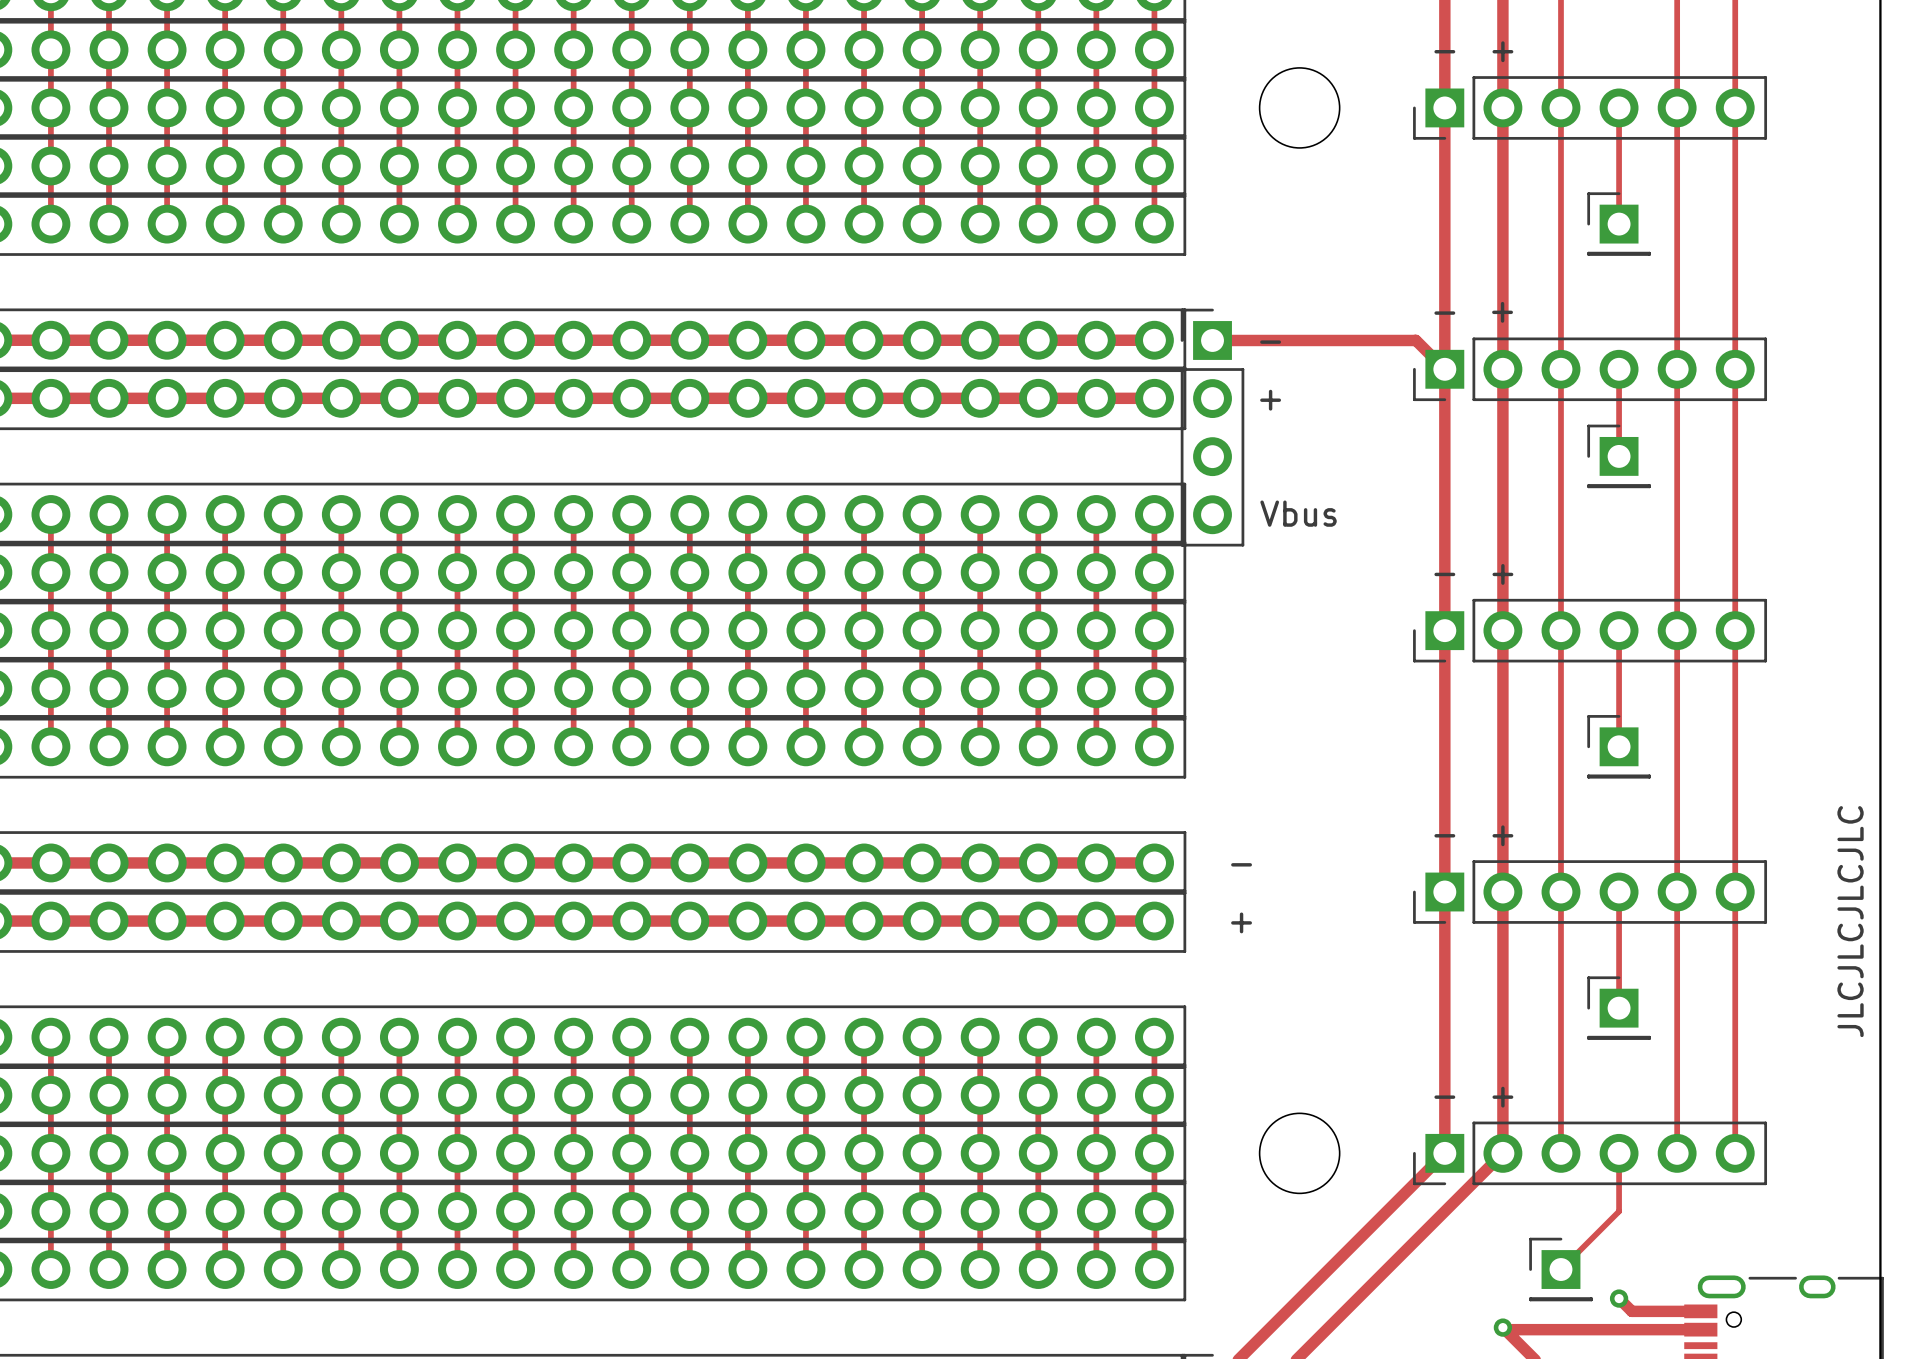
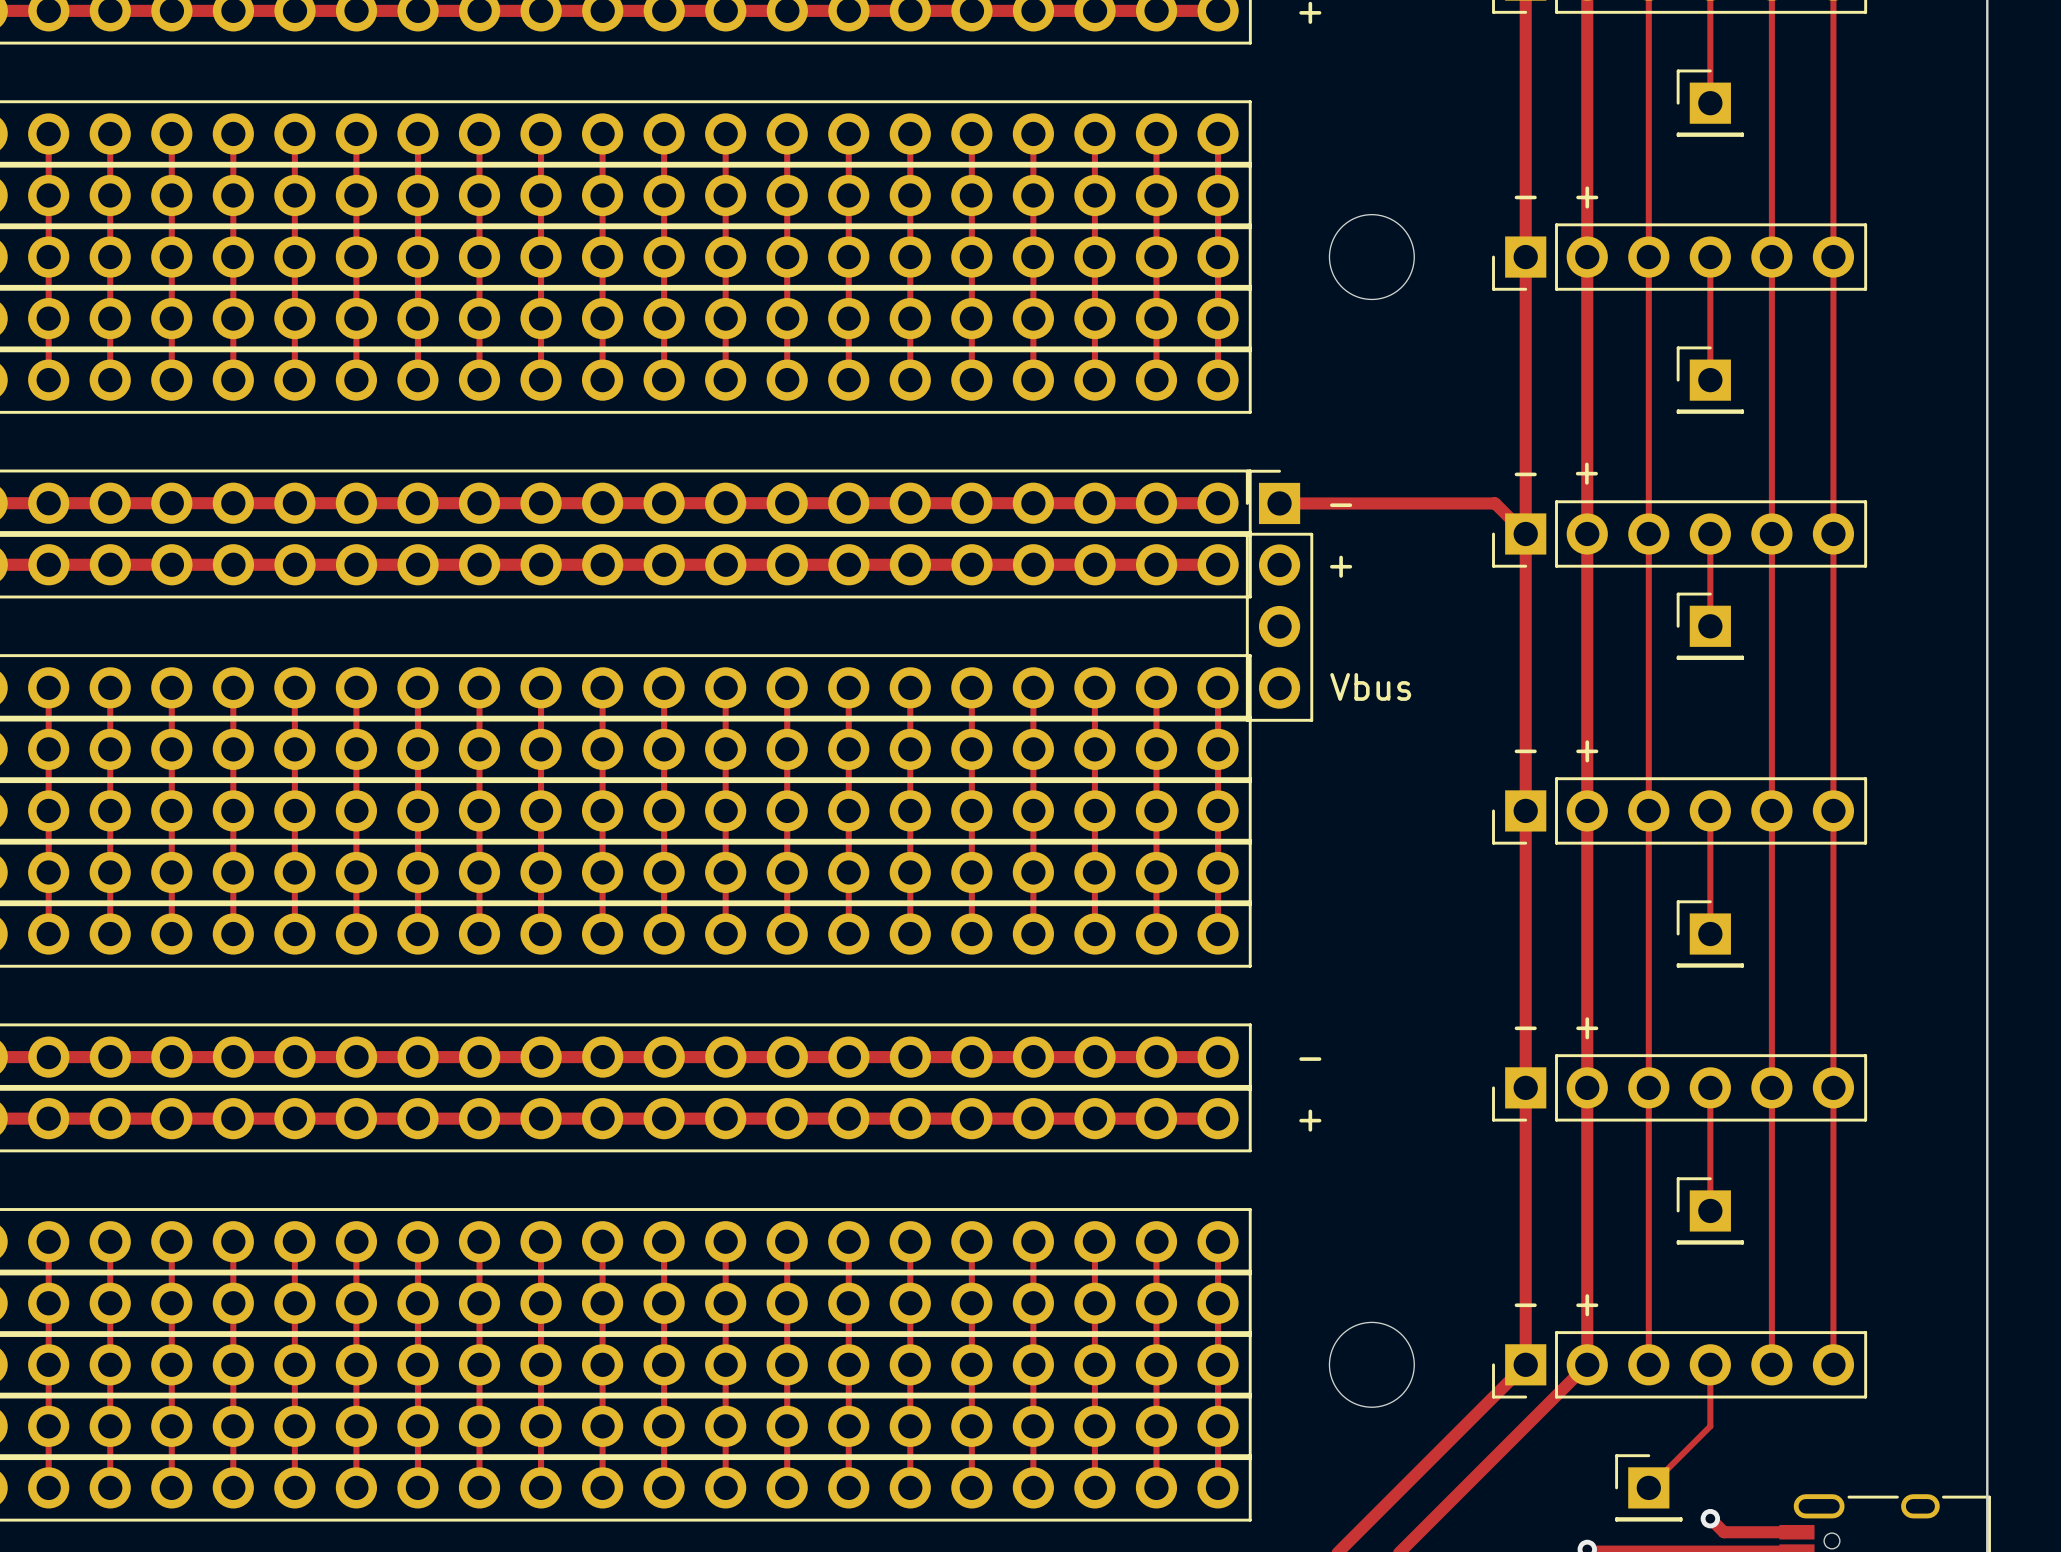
text: JLCJLCJLCJLC (1850, 921) -> none

